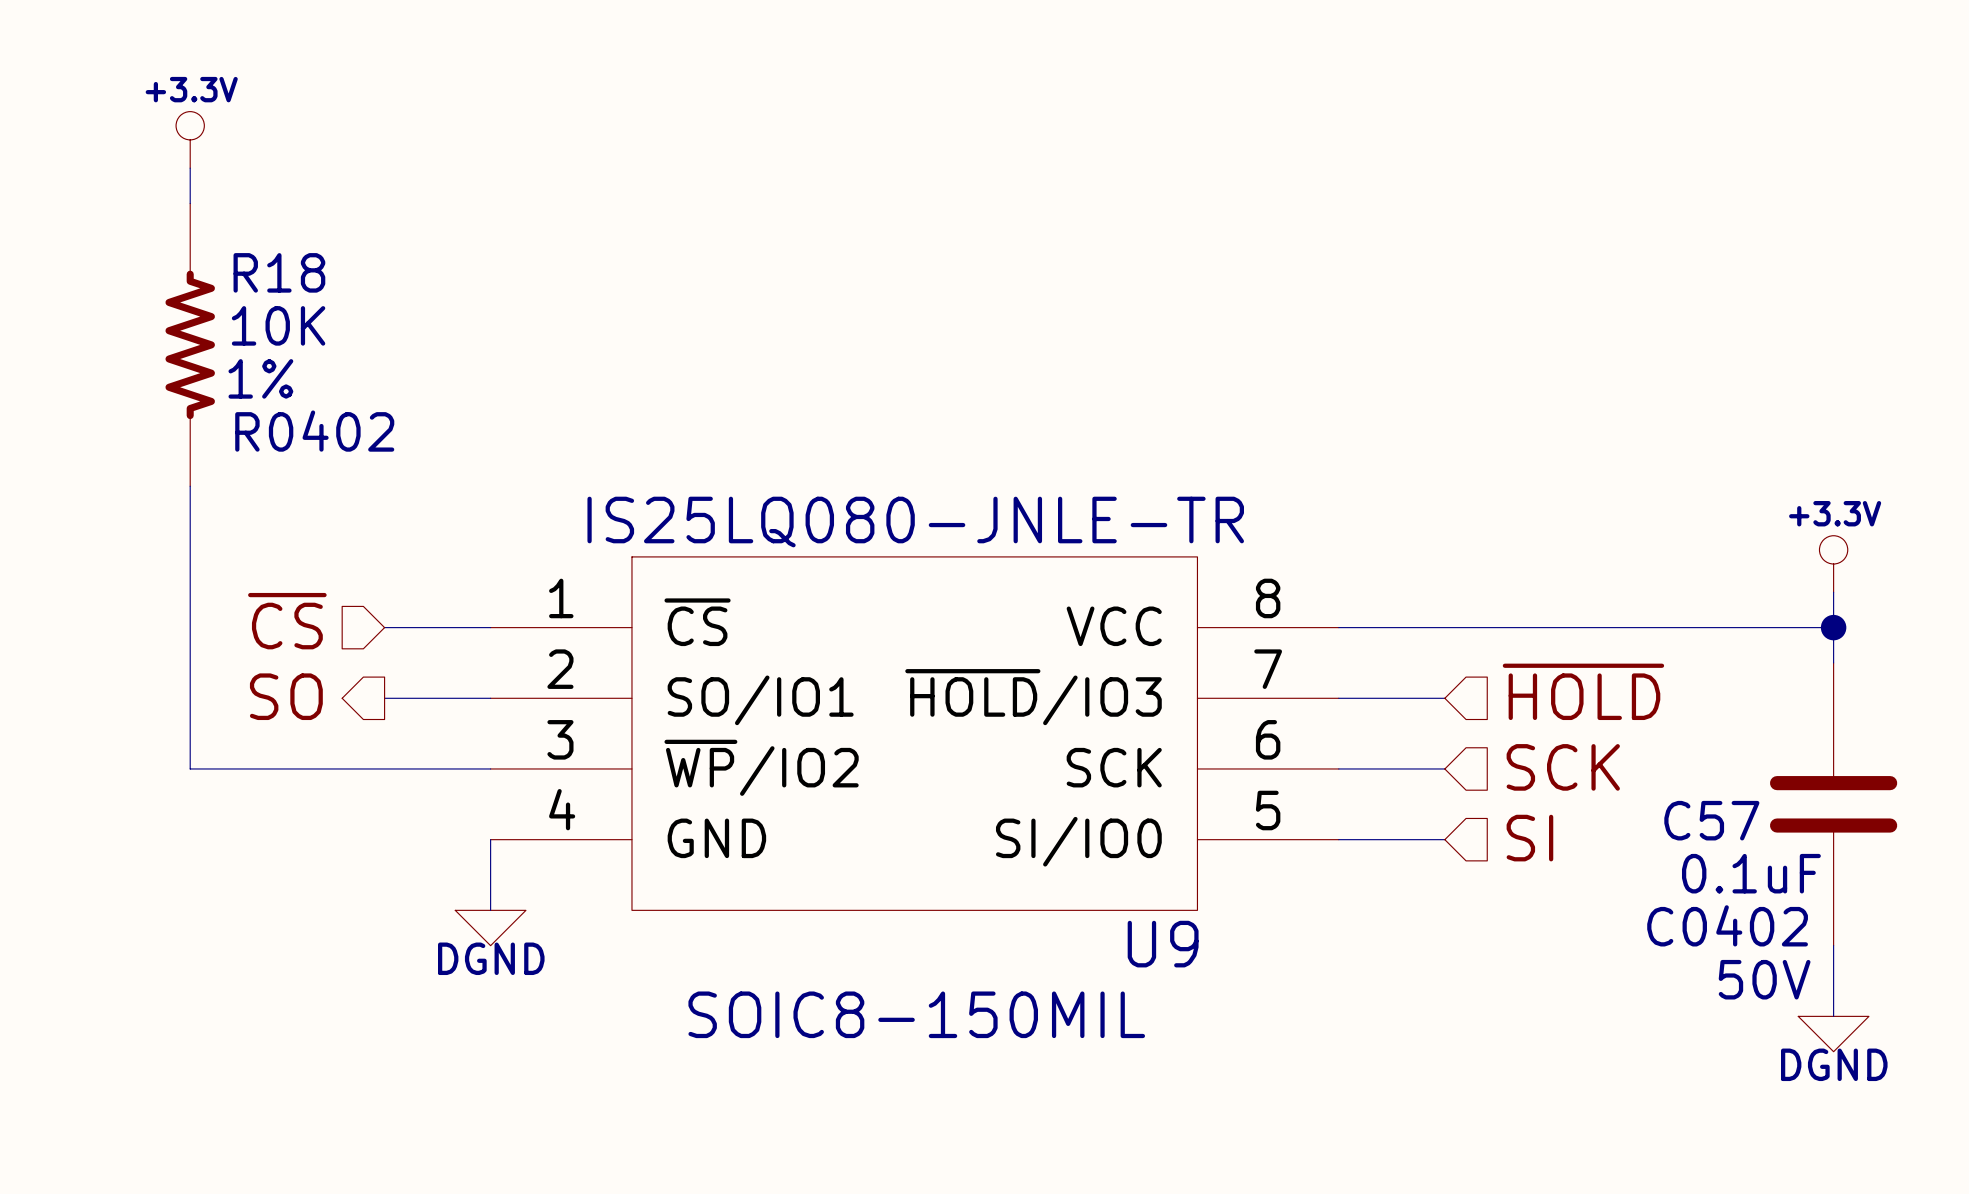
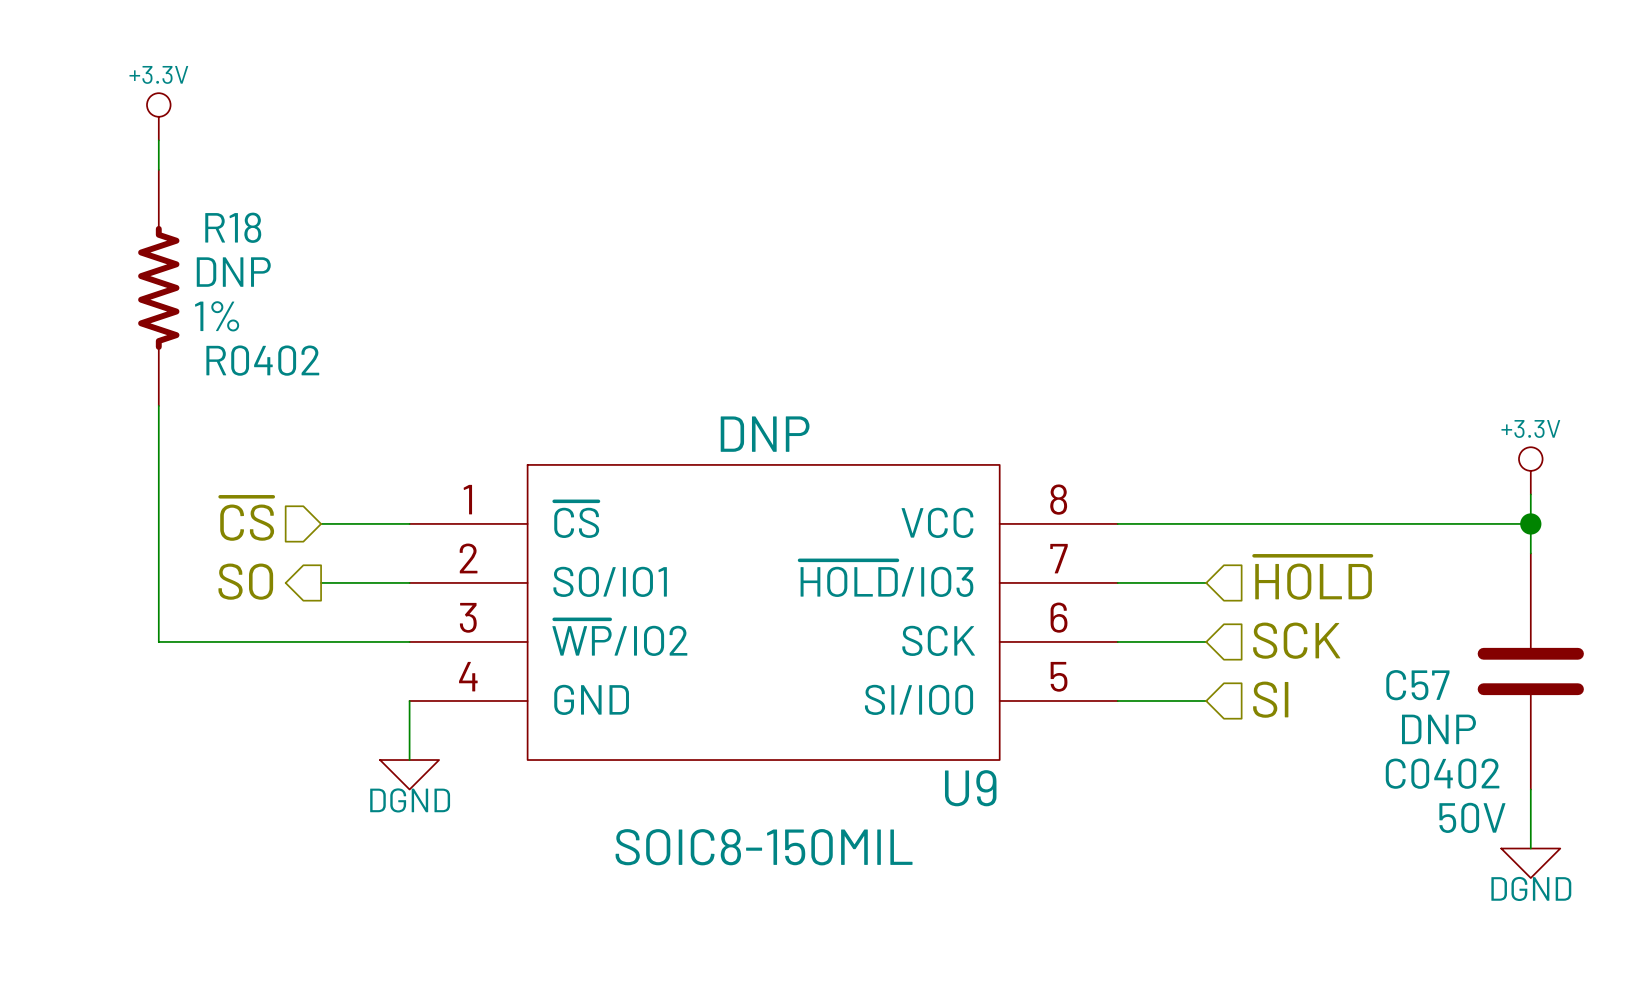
R18 value: 10K (278, 325) -> DNP (233, 272)
U9 value: IS25LQ080-JNLE-TR (915, 522) -> DNP (765, 434)
C57 value: 0.1uF (1751, 873) -> DNP (1438, 729)

